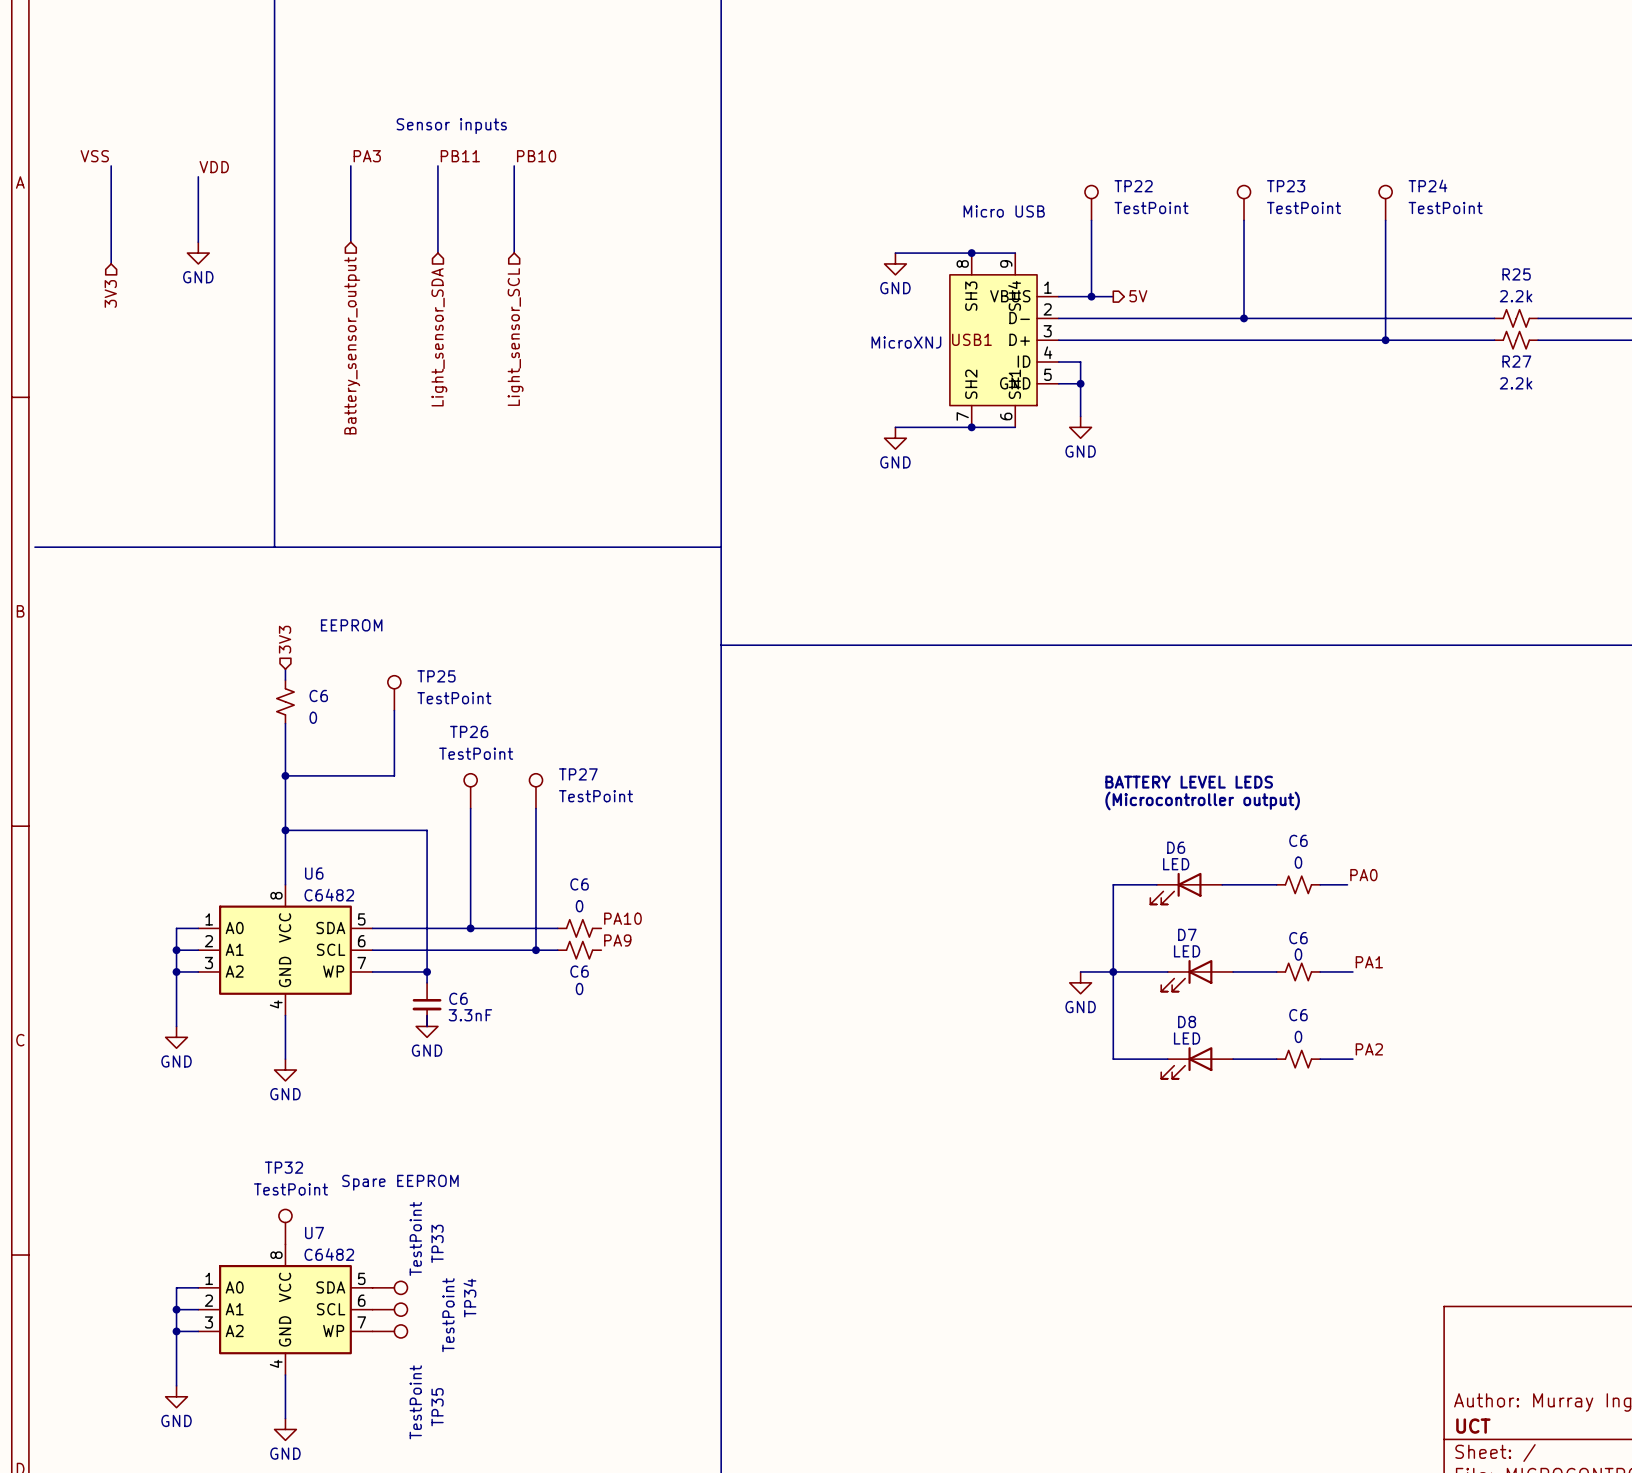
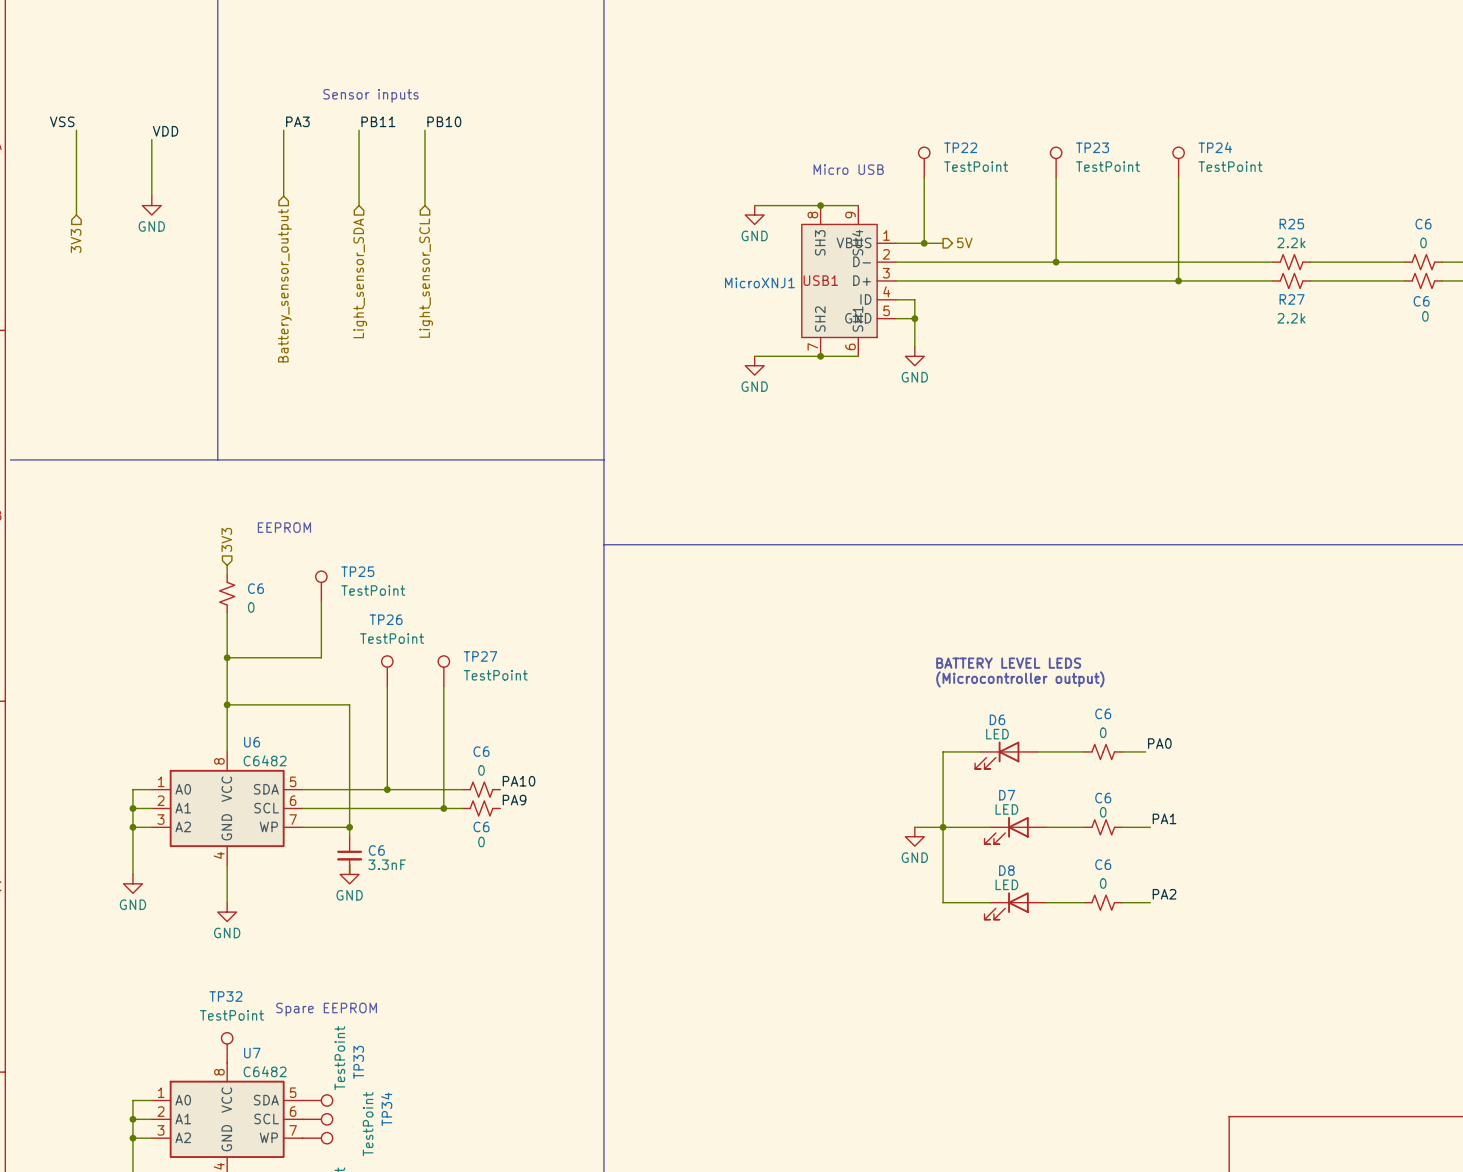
MicroXNJ name: MicroXNJ (906, 342) -> MicroXNJ1 (759, 282)

